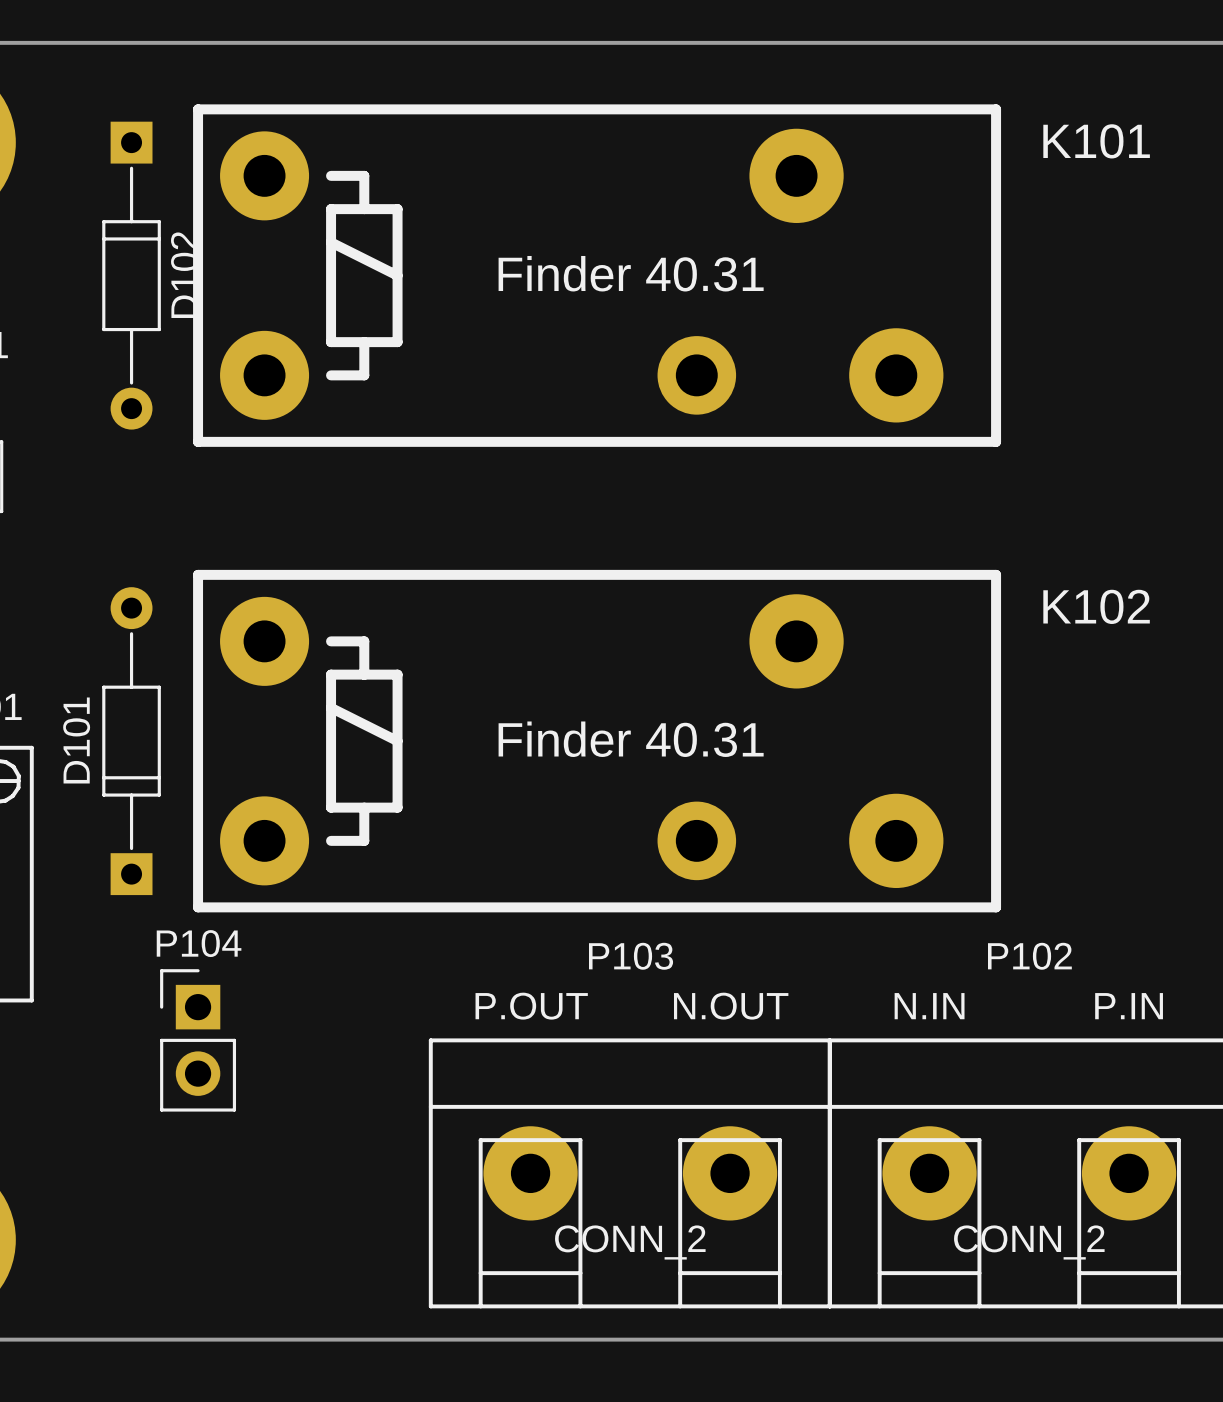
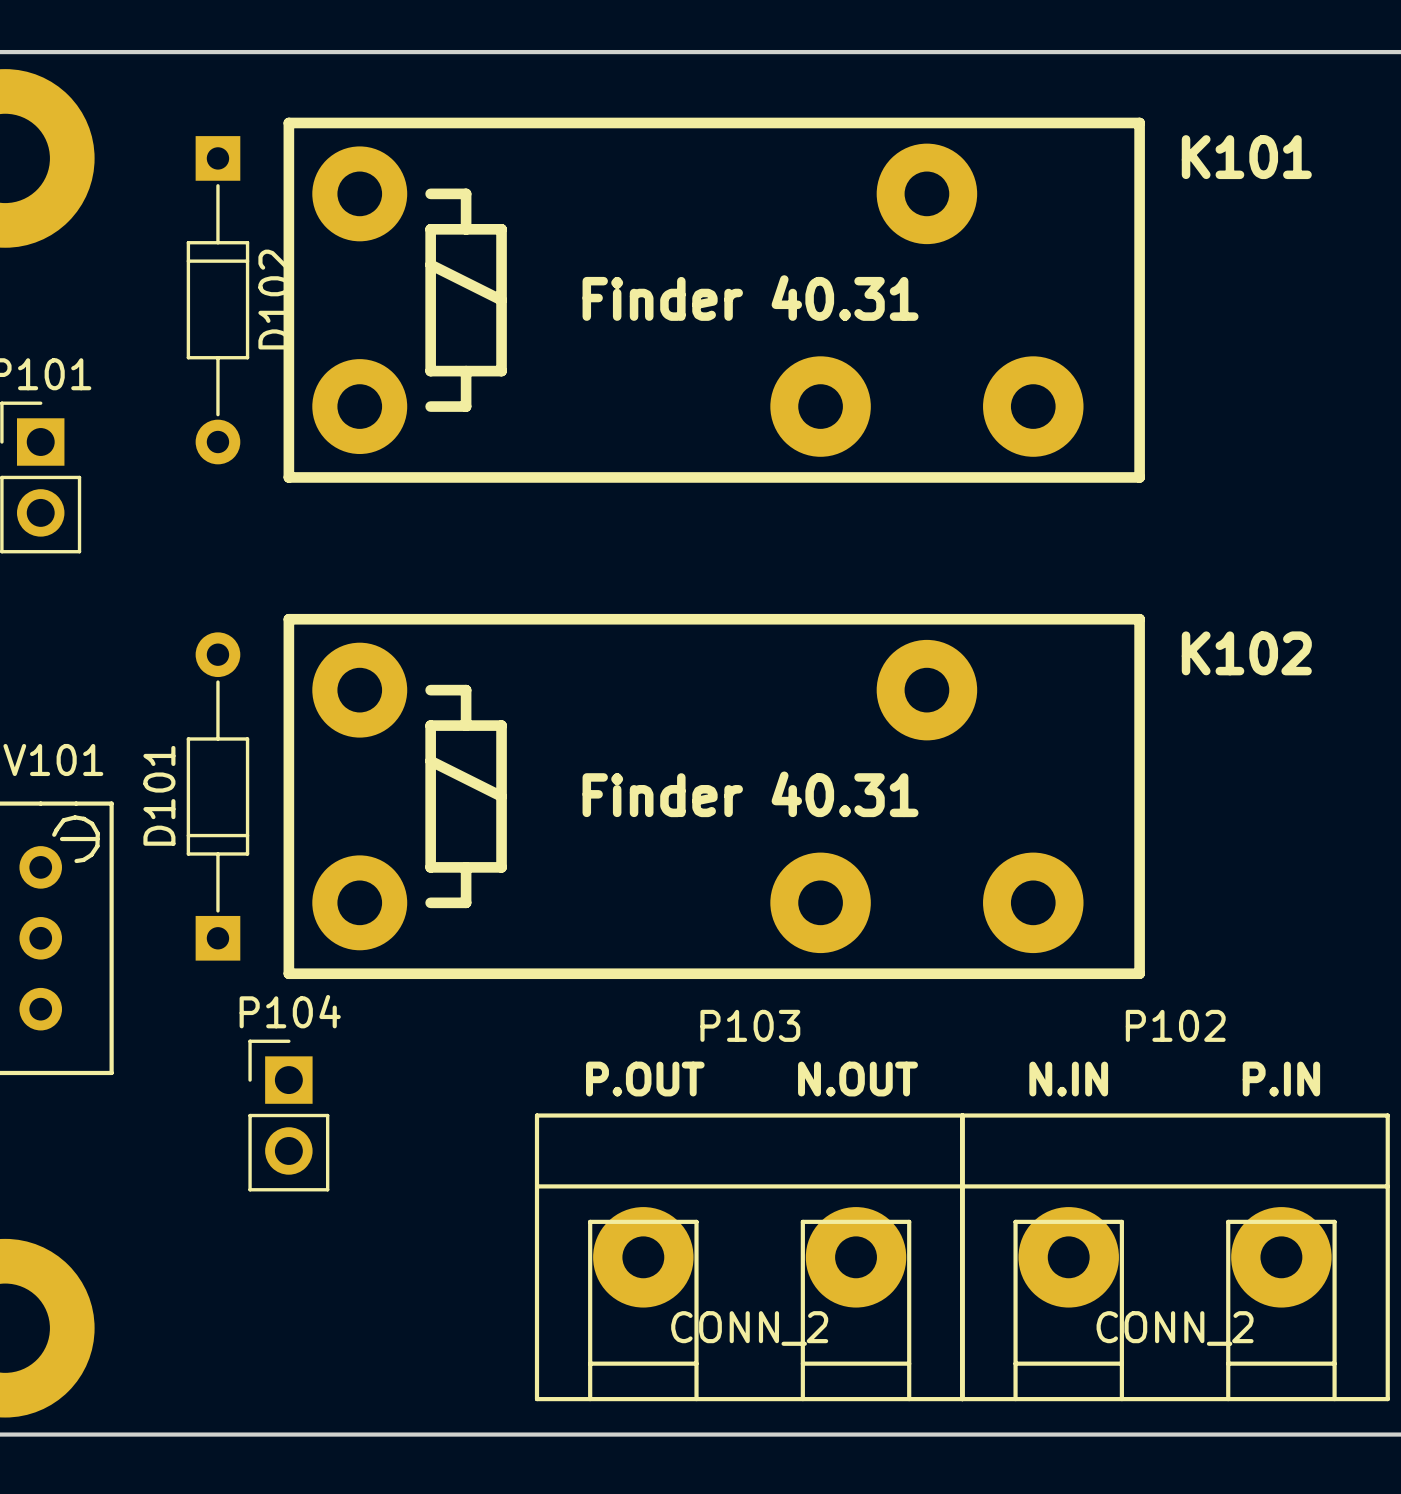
K101 footprint: [193, 104, 1002, 447] -> [283, 117, 1145, 483]
K102 footprint: [193, 569, 1002, 913] -> [283, 613, 1145, 980]

